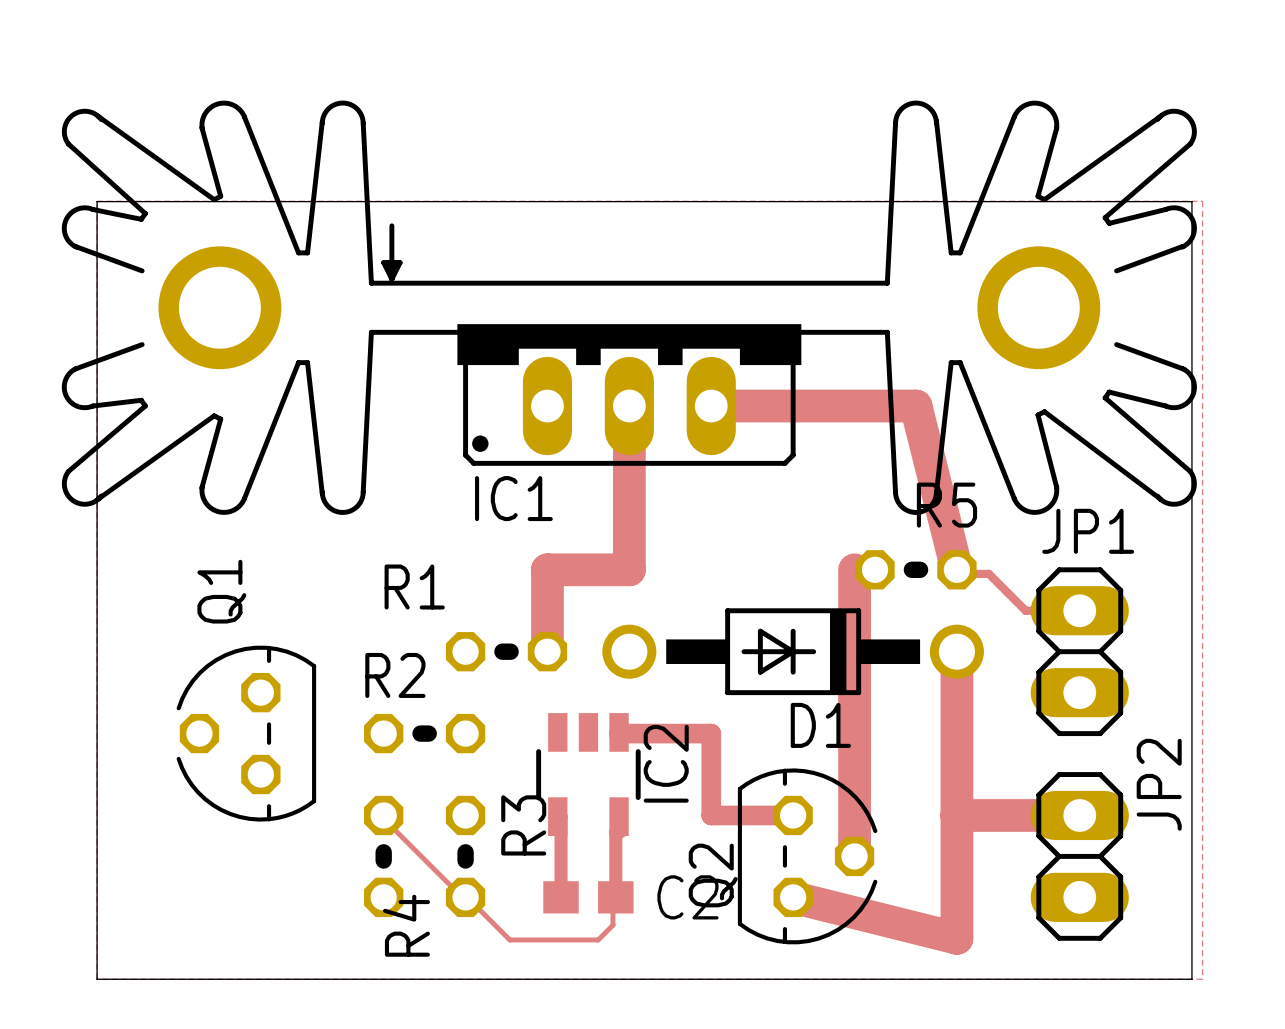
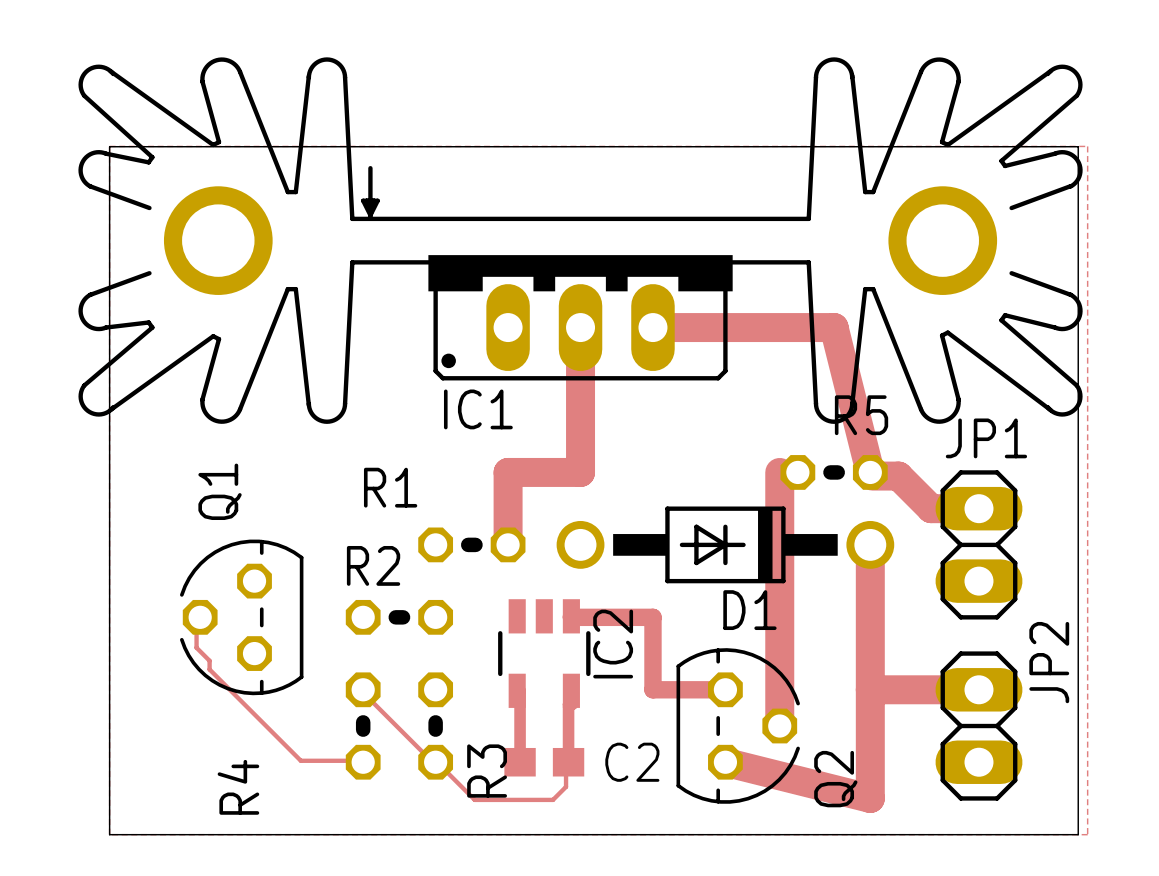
track width: thin (959, 573) (988, 573) (1025, 610) (1079, 610) -> thick (872, 476) (898, 476) (931, 508) (978, 508)
track: none -> (200, 617) (196, 617) (196, 647) (209, 660) (209, 669) (300, 760) (363, 762)
R3 name position: R3 (523, 825) -> R3 (487, 771)
Q2 name position: Q2 (713, 875) -> Q2 (835, 779)
R4 name position: R4 (406, 925) -> R4 (238, 787)

